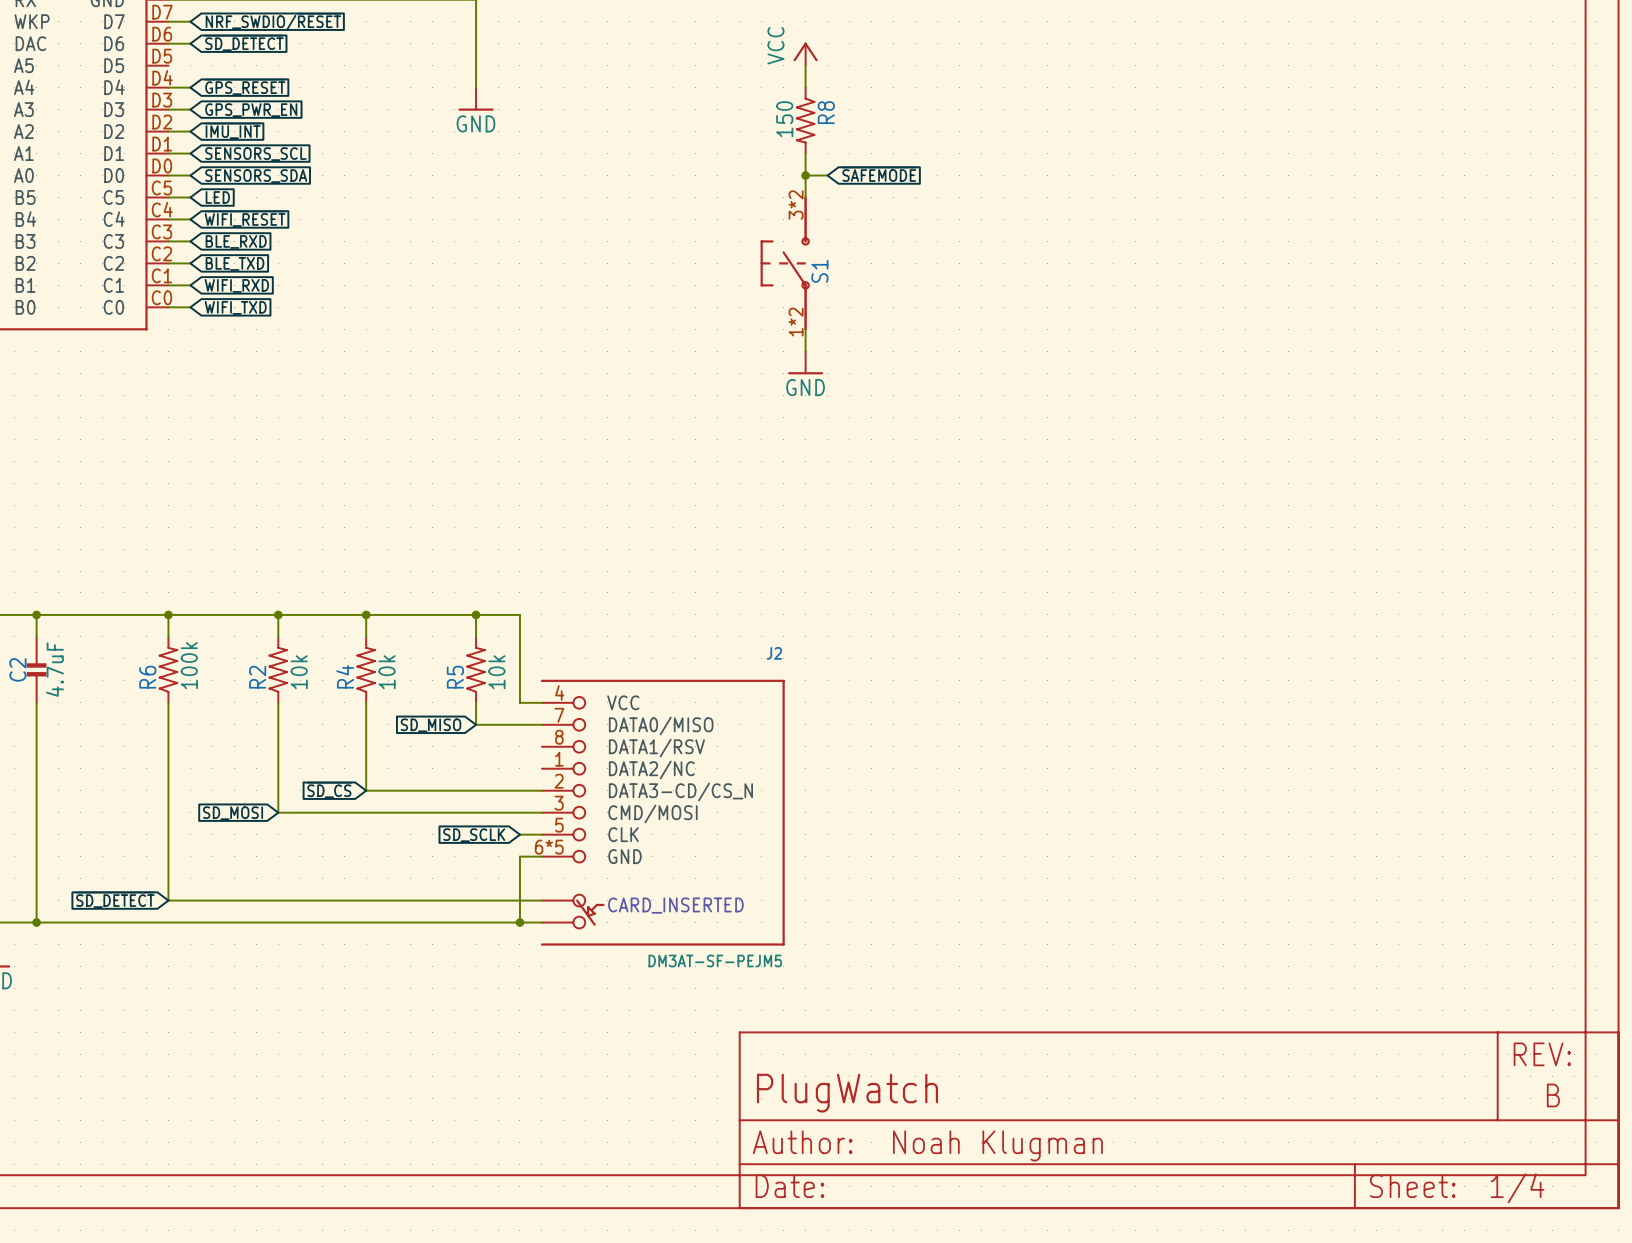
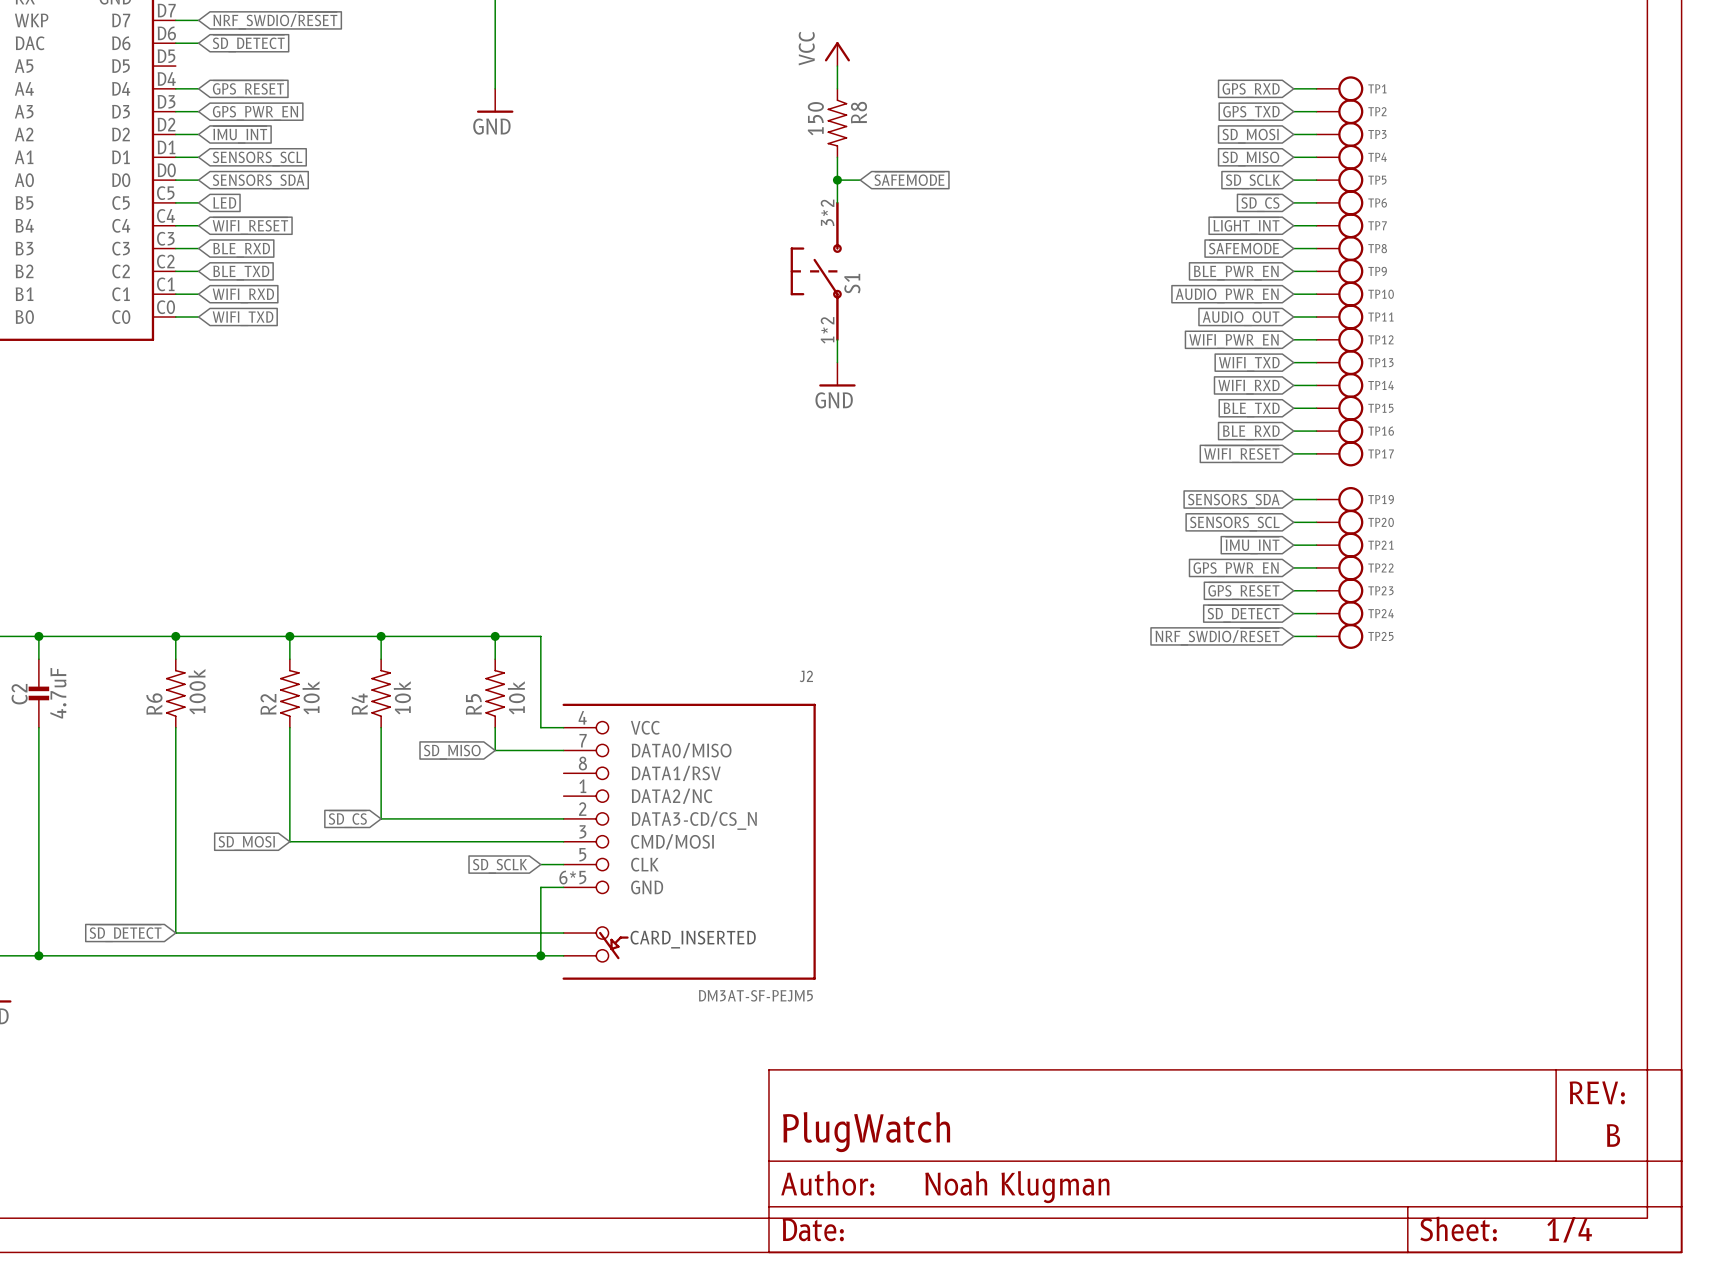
wire: none -> (1293, 88) (1316, 88)
TP1: none -> (1339, 88)
global label: none -> GPS_RXD (1251, 90)
wire: none -> (1293, 111) (1316, 111)
TP2: none -> (1339, 111)
global label: none -> GPS_TXD (1251, 113)
wire: none -> (1293, 134) (1316, 134)
TP3: none -> (1339, 134)
global label: none -> SD_MOSI (1250, 136)
wire: none -> (1293, 157) (1316, 157)
TP4: none -> (1339, 157)
global label: none -> SD_MISO (1250, 159)
wire: none -> (1293, 180) (1316, 180)
TP5: none -> (1339, 180)
global label: none -> SD_SCLK (1252, 181)
global label: none -> ~{SD_CS} (1260, 203)
wire: none -> (1293, 202) (1316, 202)
TP6: none -> (1339, 202)
global label: none -> ~{LIGHT_INT} (1246, 226)
wire: none -> (1293, 225) (1316, 225)
TP7: none -> (1339, 225)
global label: none -> ~{SAFEMODE} (1244, 247)
wire: none -> (1293, 248) (1316, 248)
TP8: none -> (1339, 248)
global label: none -> BLE_PWR_EN (1236, 273)
wire: none -> (1293, 271) (1316, 271)
TP9: none -> (1339, 271)
global label: none -> AUDIO_PWR_EN (1227, 295)
wire: none -> (1293, 294) (1316, 294)
TP10: none -> (1339, 294)
global label: none -> AUDIO_OUT (1241, 318)
wire: none -> (1293, 317) (1316, 317)
TP11: none -> (1339, 317)
global label: none -> WIFI_PWR_EN (1233, 341)
wire: none -> (1293, 339) (1316, 339)
TP12: none -> (1339, 339)
global label: none -> WIFI_TXD (1249, 364)
wire: none -> (1293, 362) (1316, 362)
TP13: none -> (1339, 362)
global label: none -> WIFI_RXD (1249, 387)
wire: none -> (1293, 385) (1316, 385)
TP14: none -> (1339, 385)
global label: none -> BLE_TXD (1251, 409)
wire: none -> (1293, 408) (1316, 408)
TP15: none -> (1339, 408)
global label: none -> BLE_RXD (1251, 432)
wire: none -> (1293, 431) (1316, 431)
TP16: none -> (1339, 431)
global label: none -> ~{WIFI_RESET} (1241, 454)
wire: none -> (1293, 453) (1316, 453)
TP17: none -> (1339, 453)
global label: none -> SENSORS_SDA (1233, 501)
wire: none -> (1293, 499) (1316, 499)
TP19: none -> (1339, 499)
global label: none -> SENSORS_SCL (1234, 524)
wire: none -> (1293, 522) (1316, 522)
TP20: none -> (1339, 522)
global label: none -> ~{IMU_INT} (1252, 545)
wire: none -> (1293, 545) (1316, 545)
TP21: none -> (1339, 545)
global label: none -> GPS_PWR_EN (1236, 569)
wire: none -> (1293, 567) (1316, 567)
TP22: none -> (1339, 567)
global label: none -> ~{GPS_RESET} (1243, 591)
wire: none -> (1293, 590) (1316, 590)
TP23: none -> (1339, 590)
global label: none -> ~{SD_DETECT} (1243, 613)
wire: none -> (1293, 613) (1316, 613)
TP24: none -> (1339, 613)
global label: none -> NRF_SWDIO/~{RESET} (1217, 636)
wire: none -> (1293, 636) (1316, 636)
TP25: none -> (1339, 636)

